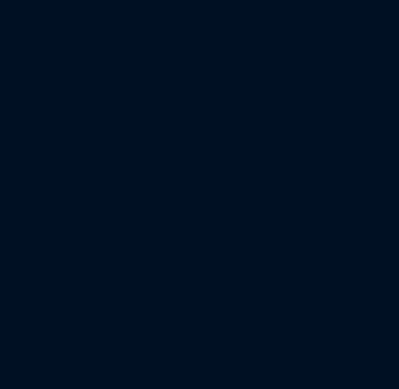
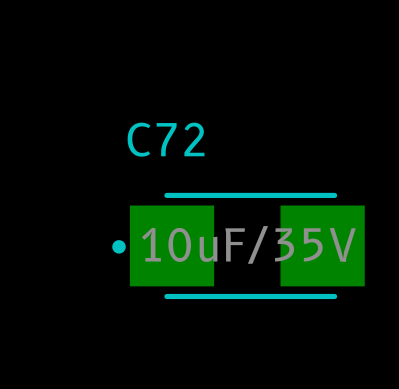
C72: none -> 10uF/35V (238, 245)

